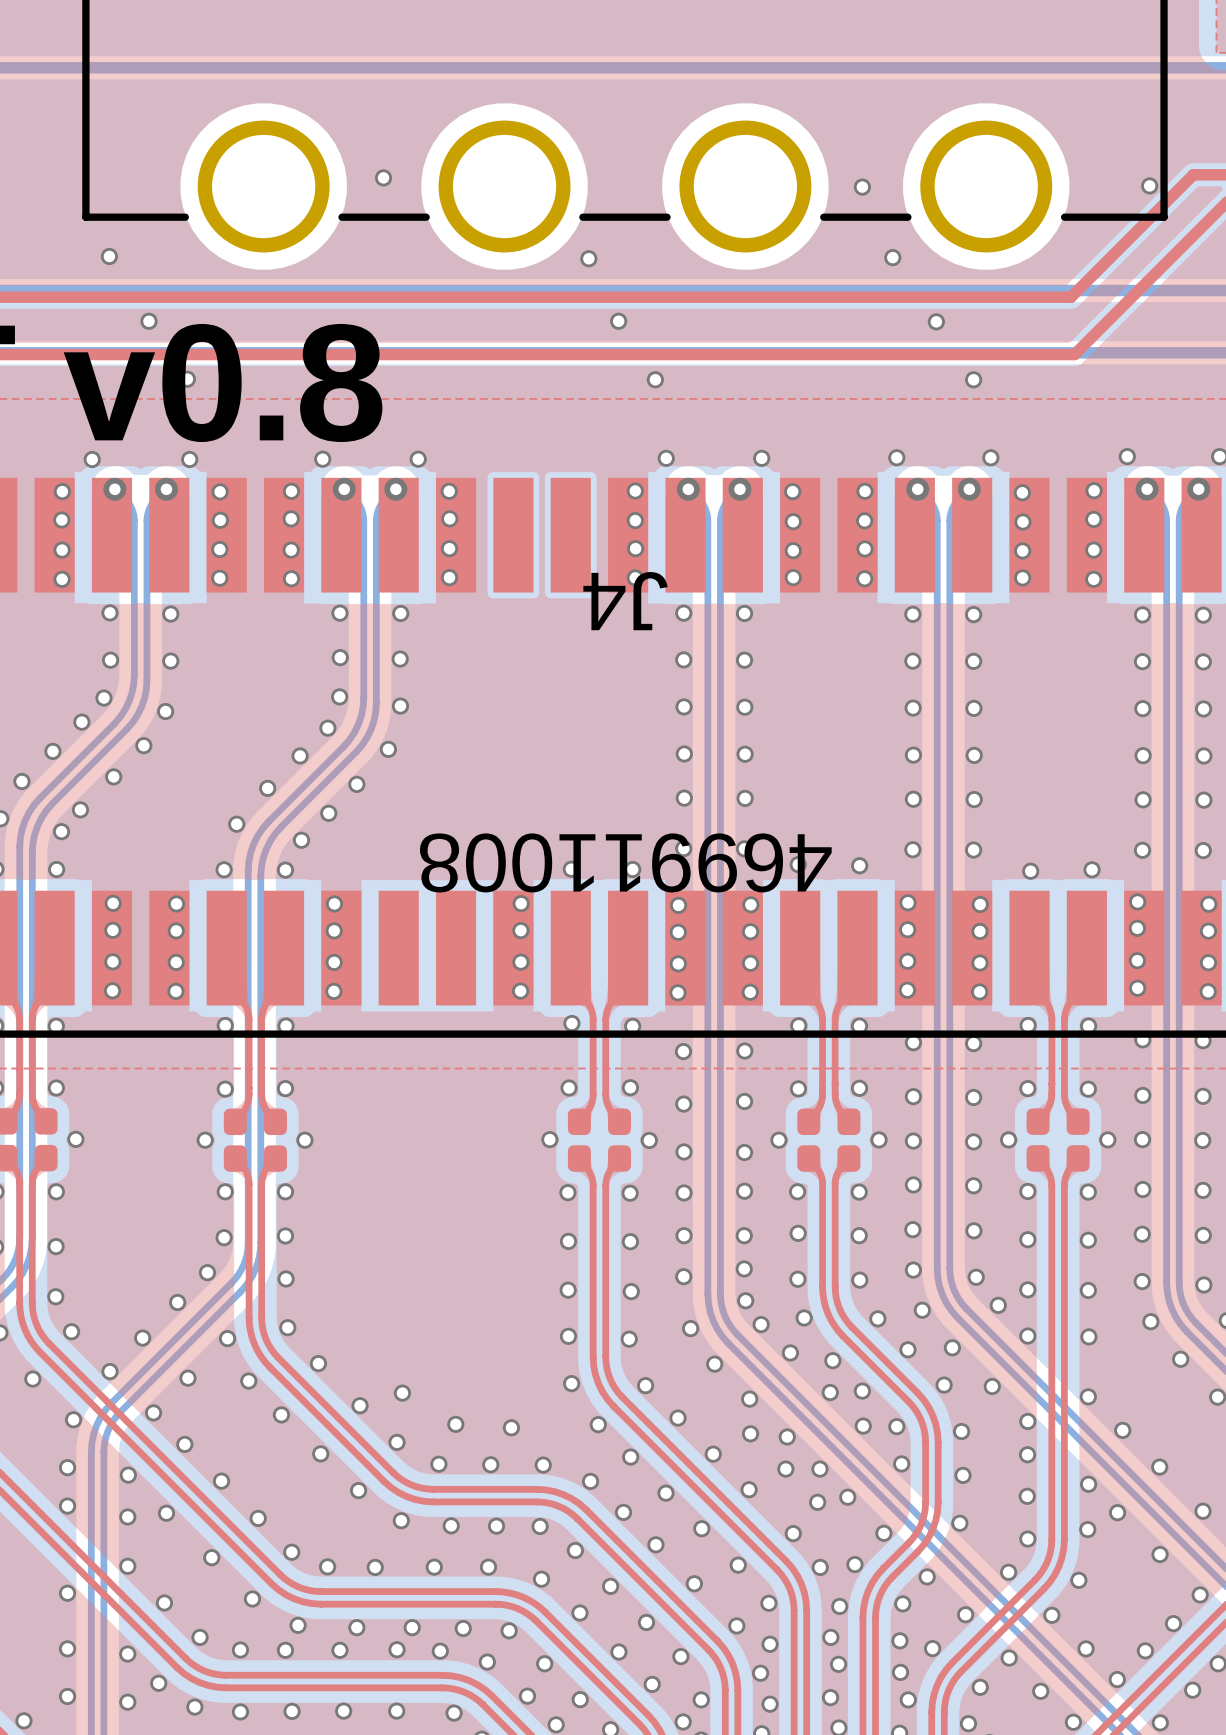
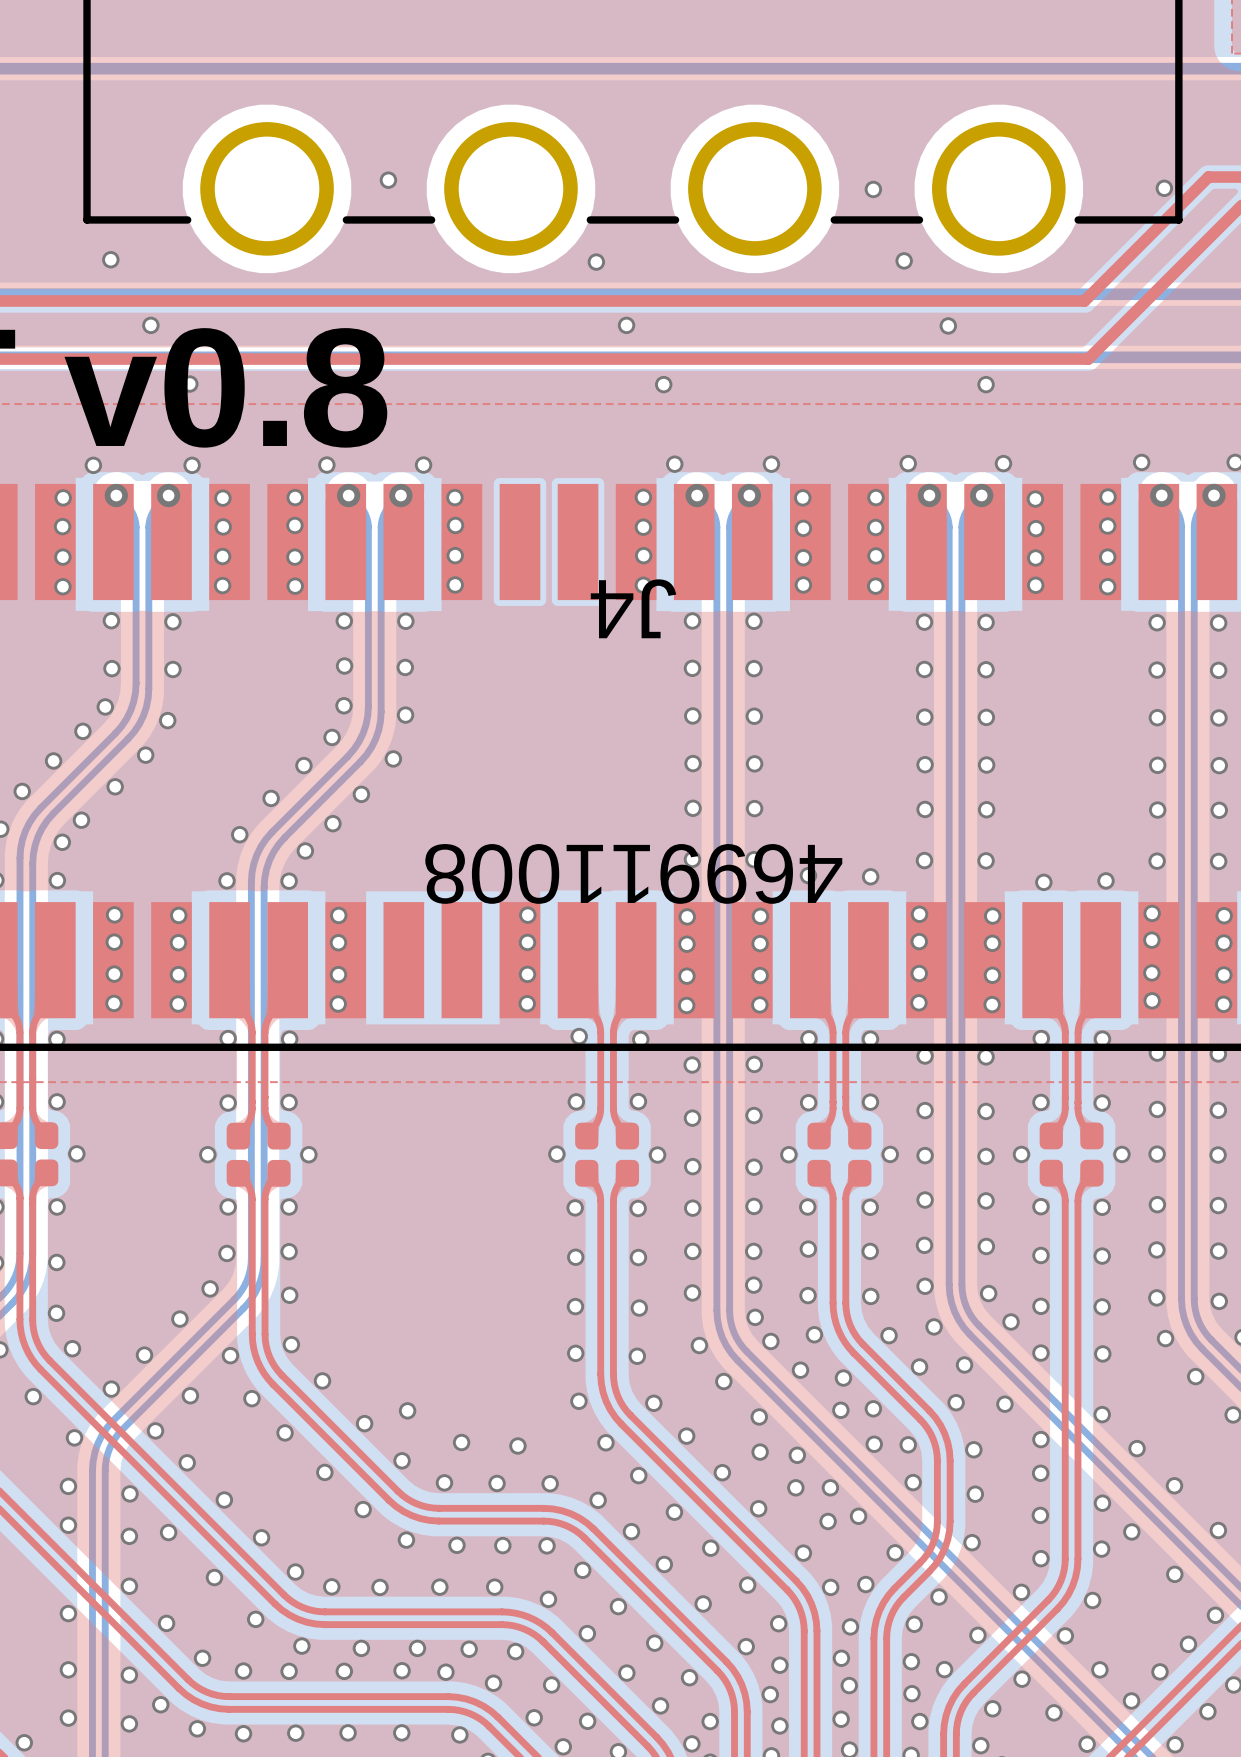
via: (571, 869) -> none
via: (632, 869) -> none

